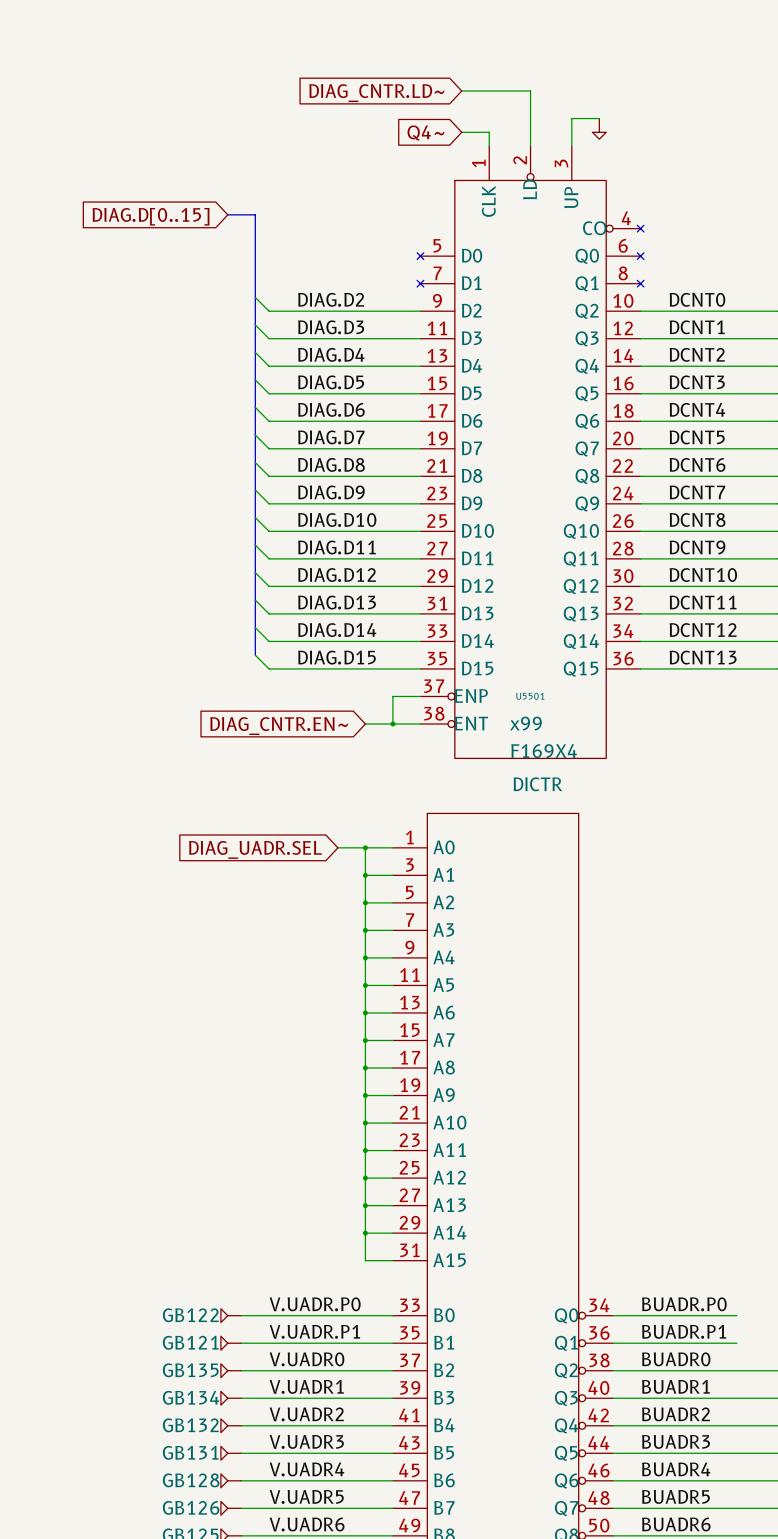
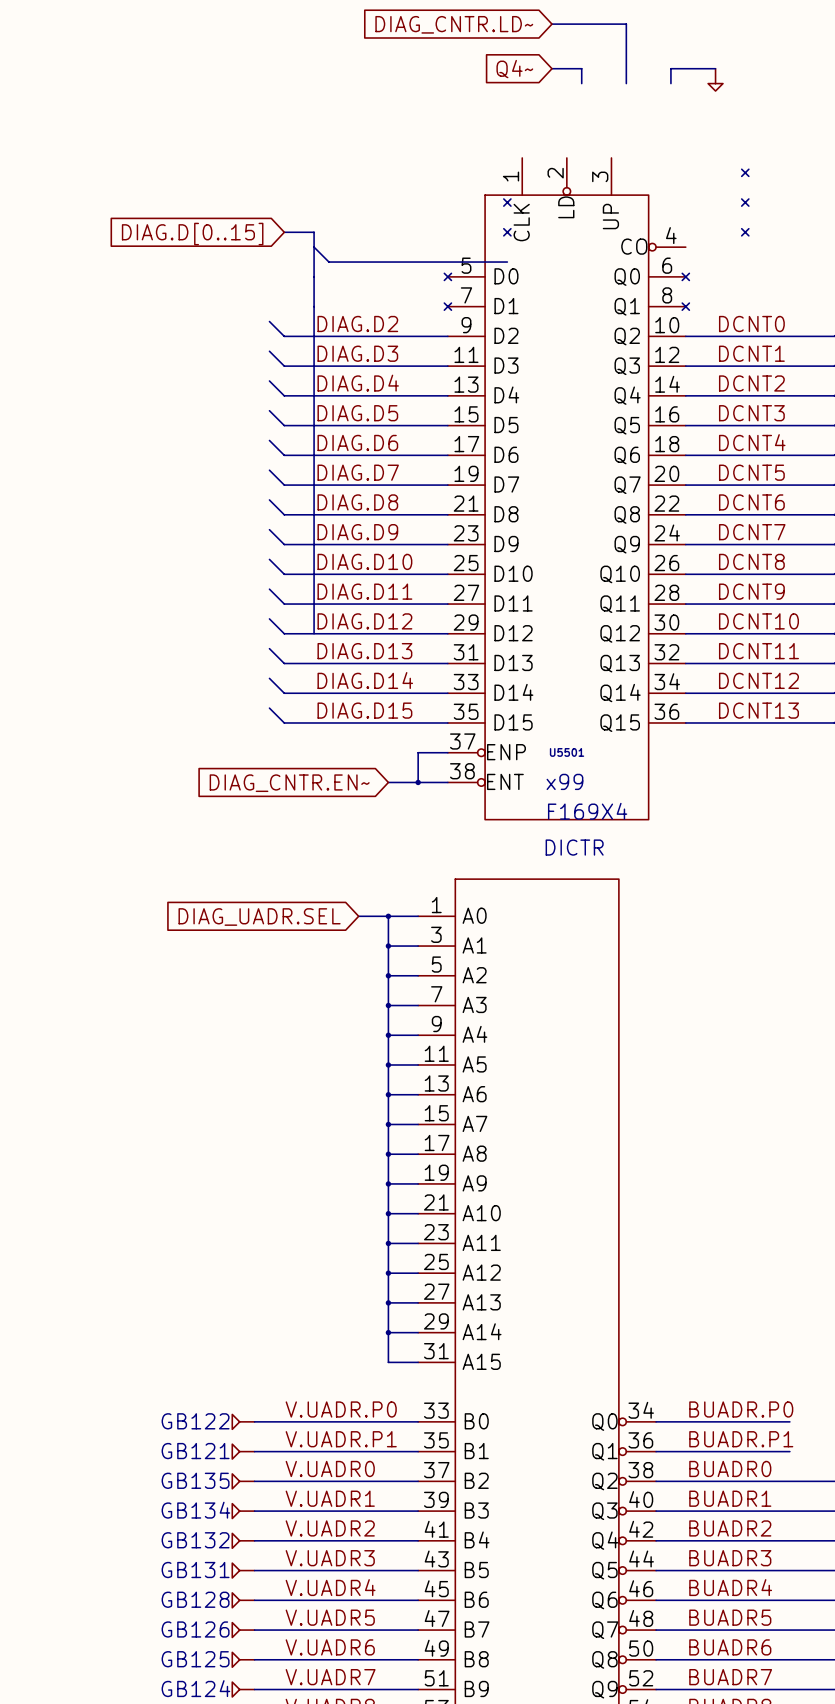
wire: none -> (715, 68) (670, 68) (670, 83)
wire: (461, 91) (530, 91) (530, 146) -> (551, 24) (626, 24) (626, 83)
global label position: DIAG_CNTR.LD~ (376, 93) -> DIAG_CNTR.LD~ (454, 24)
wire: (599, 118) (571, 118) (571, 146) -> none
power symbol position: (599, 129) -> (715, 80)
global label position: Q4~ (426, 132) -> Q4~ (514, 69)
wire: (461, 132) (489, 132) (489, 146) -> (551, 68) (581, 68) (581, 83)
no-connect mark: none -> (745, 172)
no-connect mark: none -> (507, 202)
no-connect mark: none -> (745, 202)
bus: (227, 214) (255, 214) (255, 655) -> none
bus: none -> (284, 232) (314, 232) (314, 633)
no-connect mark: none -> (507, 232)
no-connect mark: none -> (745, 232)
global label position: DIAG.D[0..15] (151, 216) -> DIAG.D[0..15] (192, 234)
wire: none -> (314, 247) (328, 262) (507, 262)
no-connect mark: (640, 228) -> none

